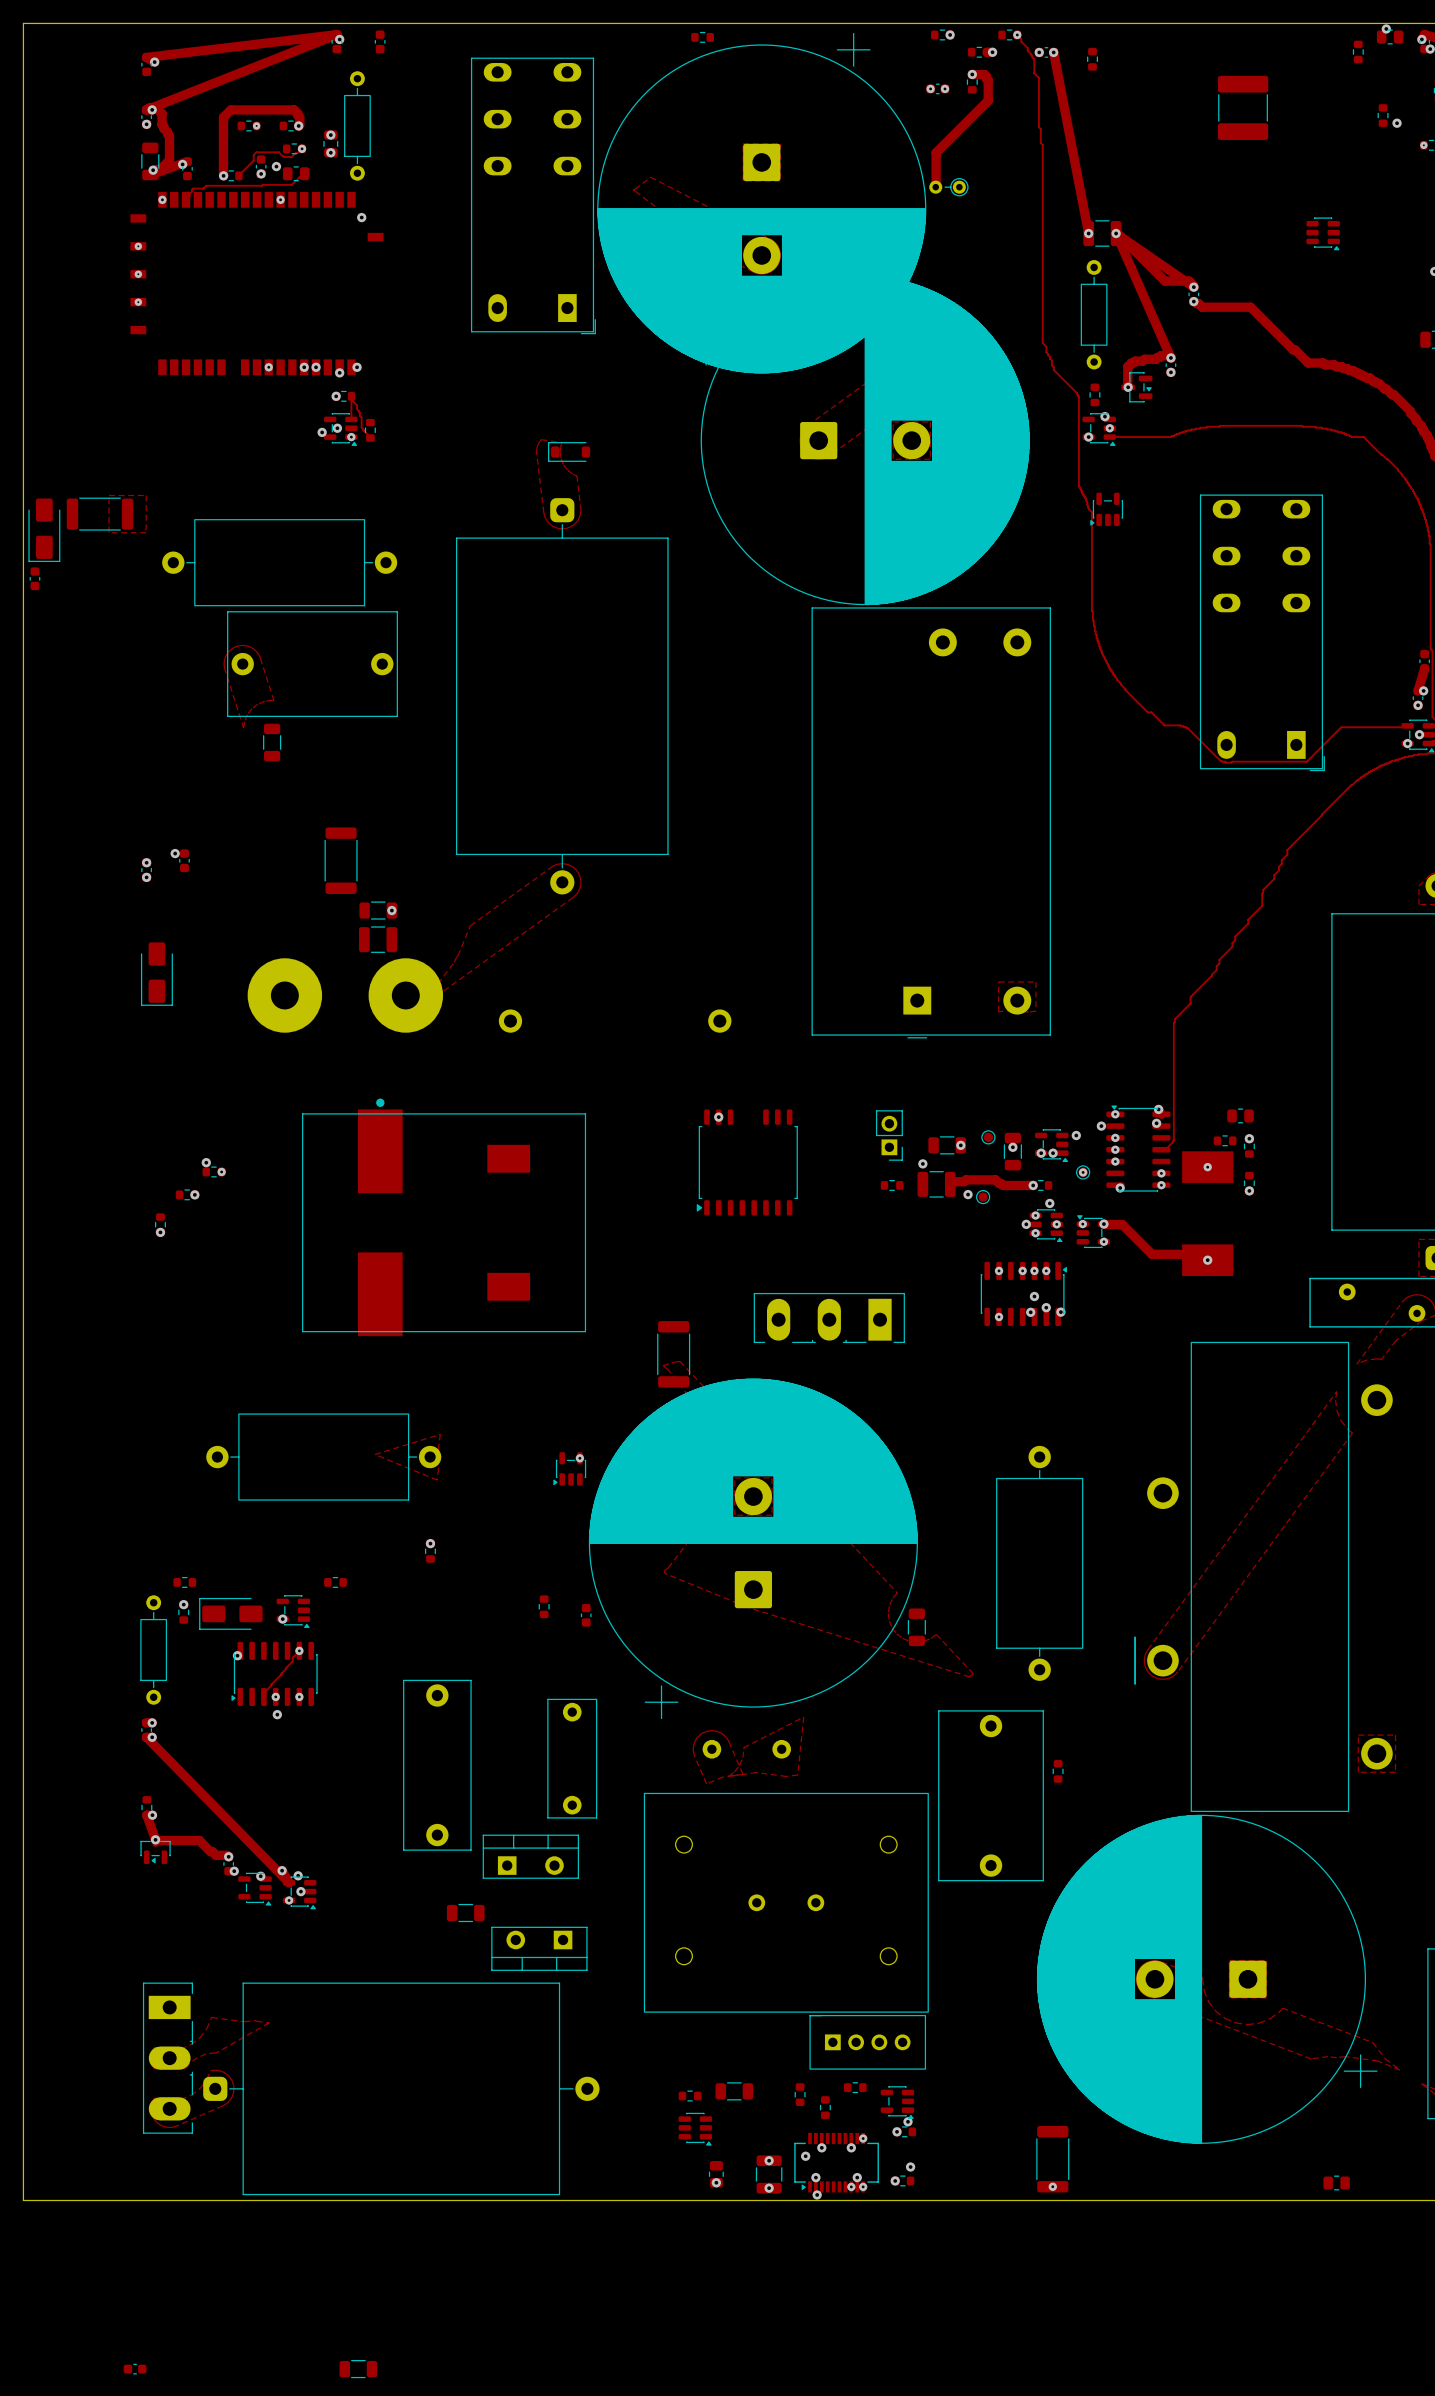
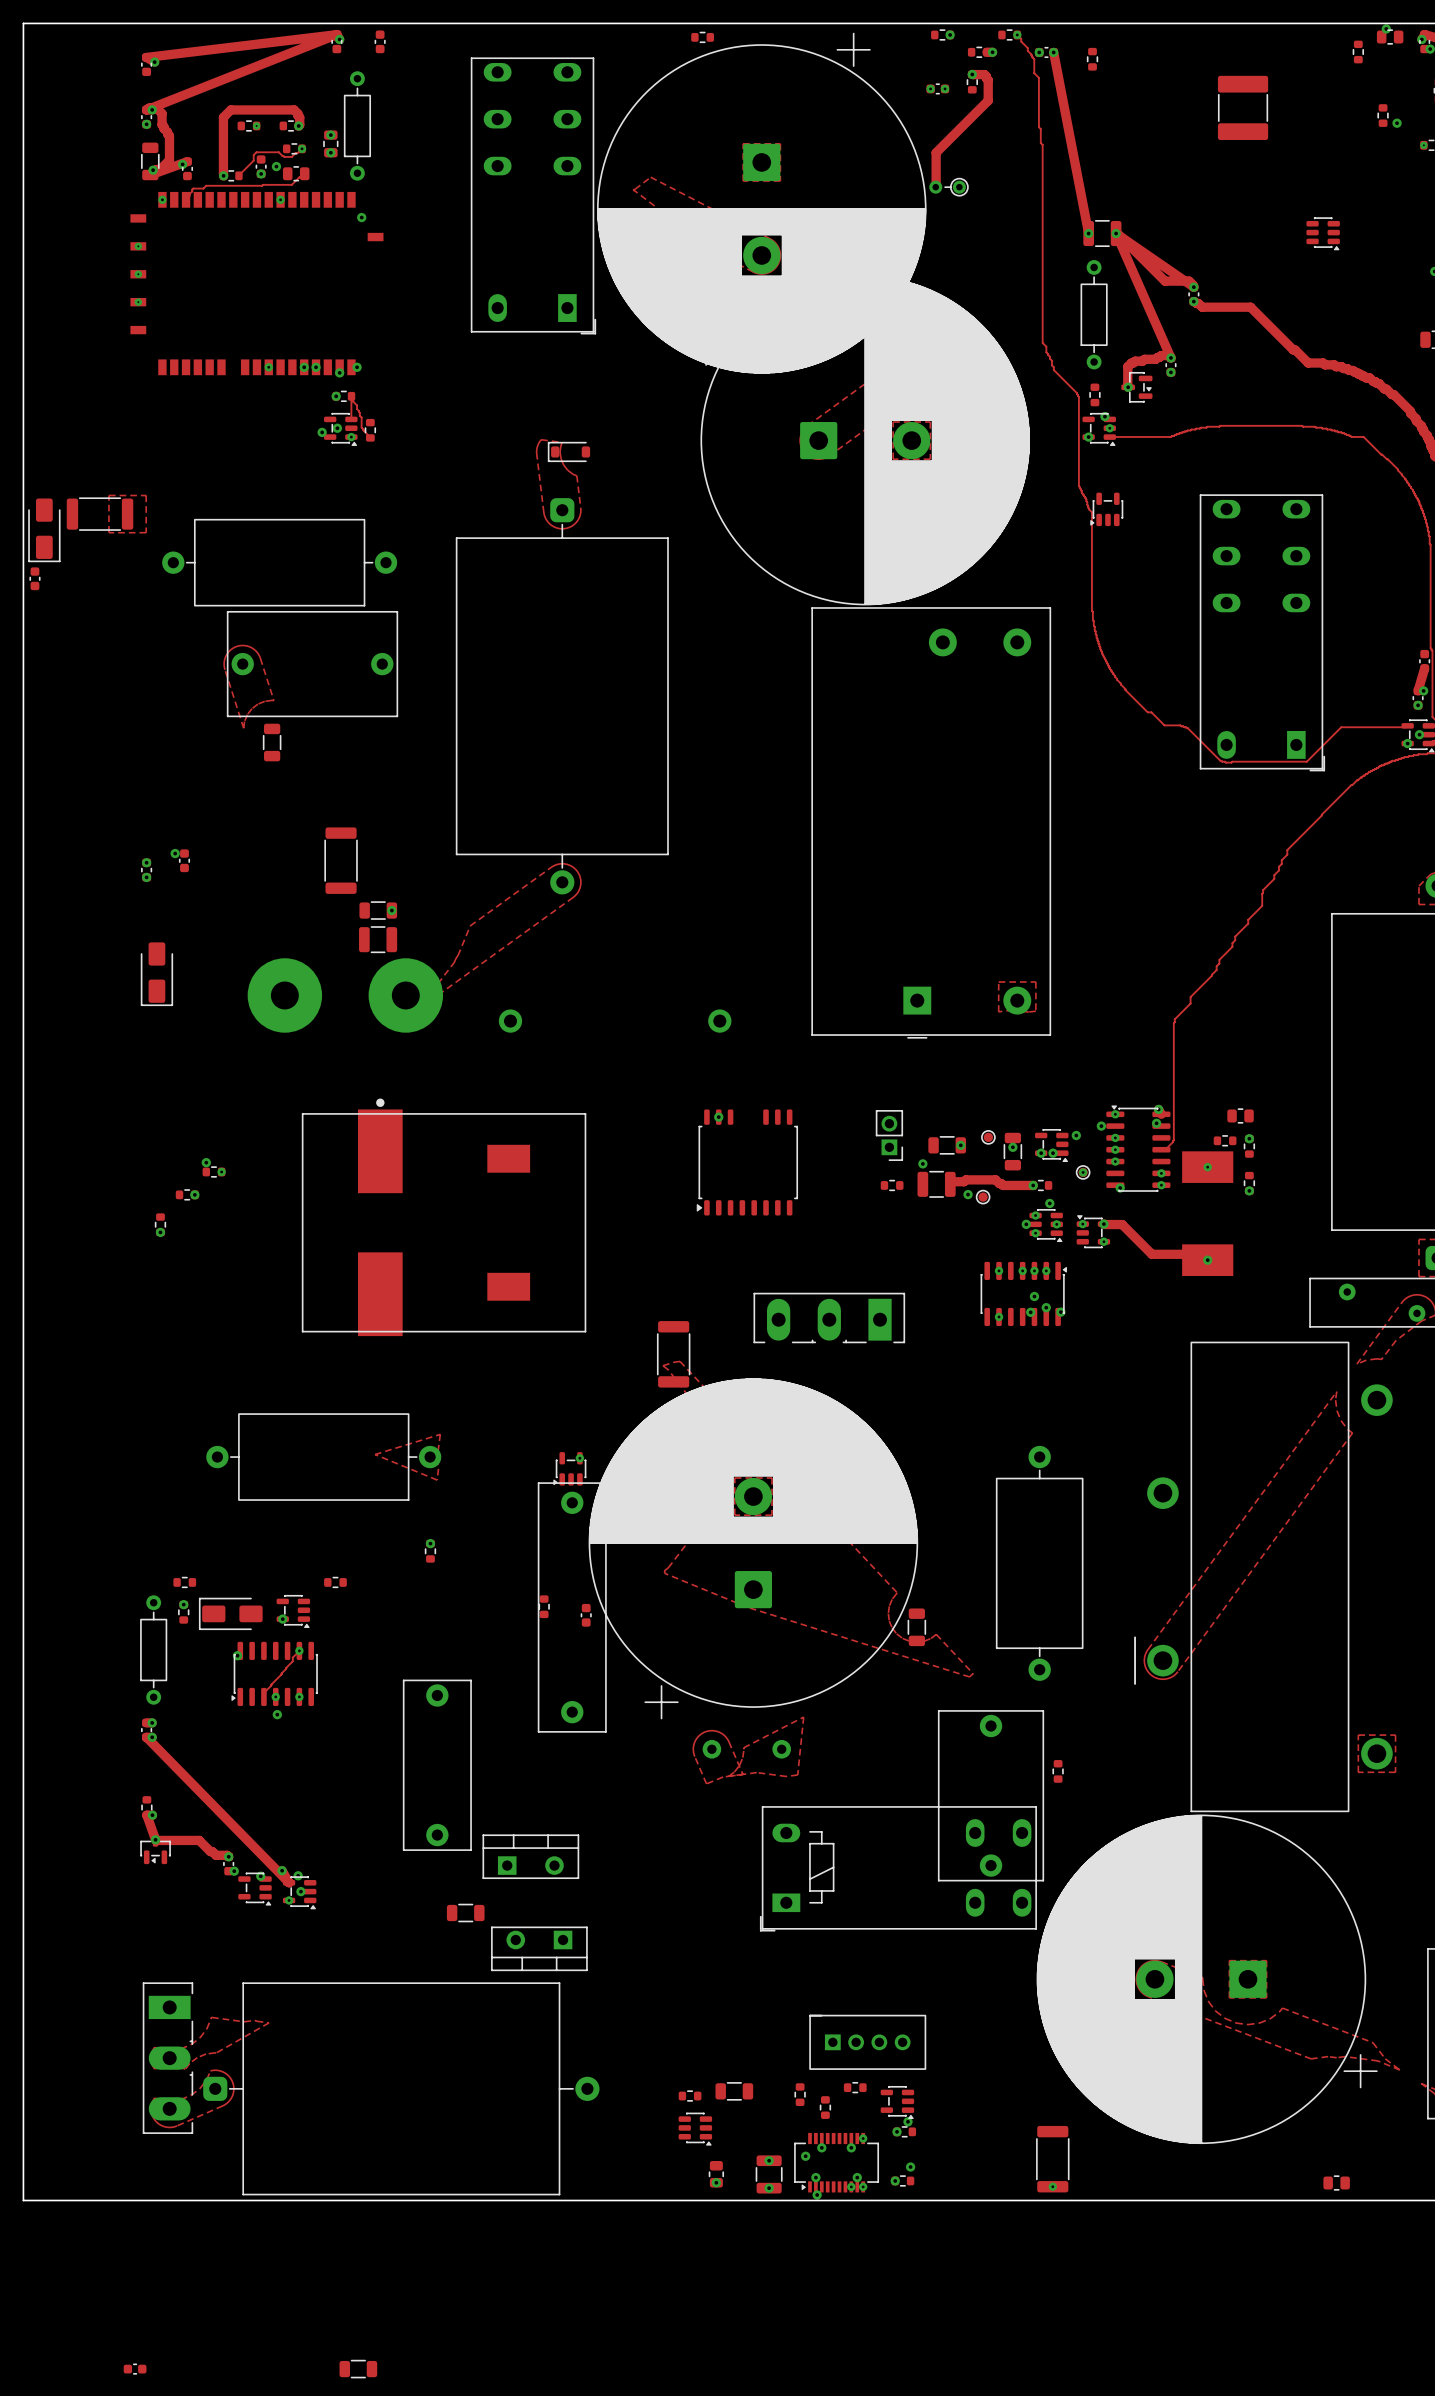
part: none -> (572, 1607)
part: (572, 1758) -> none
part: none -> (898, 1868)
part: (786, 1902) -> none

